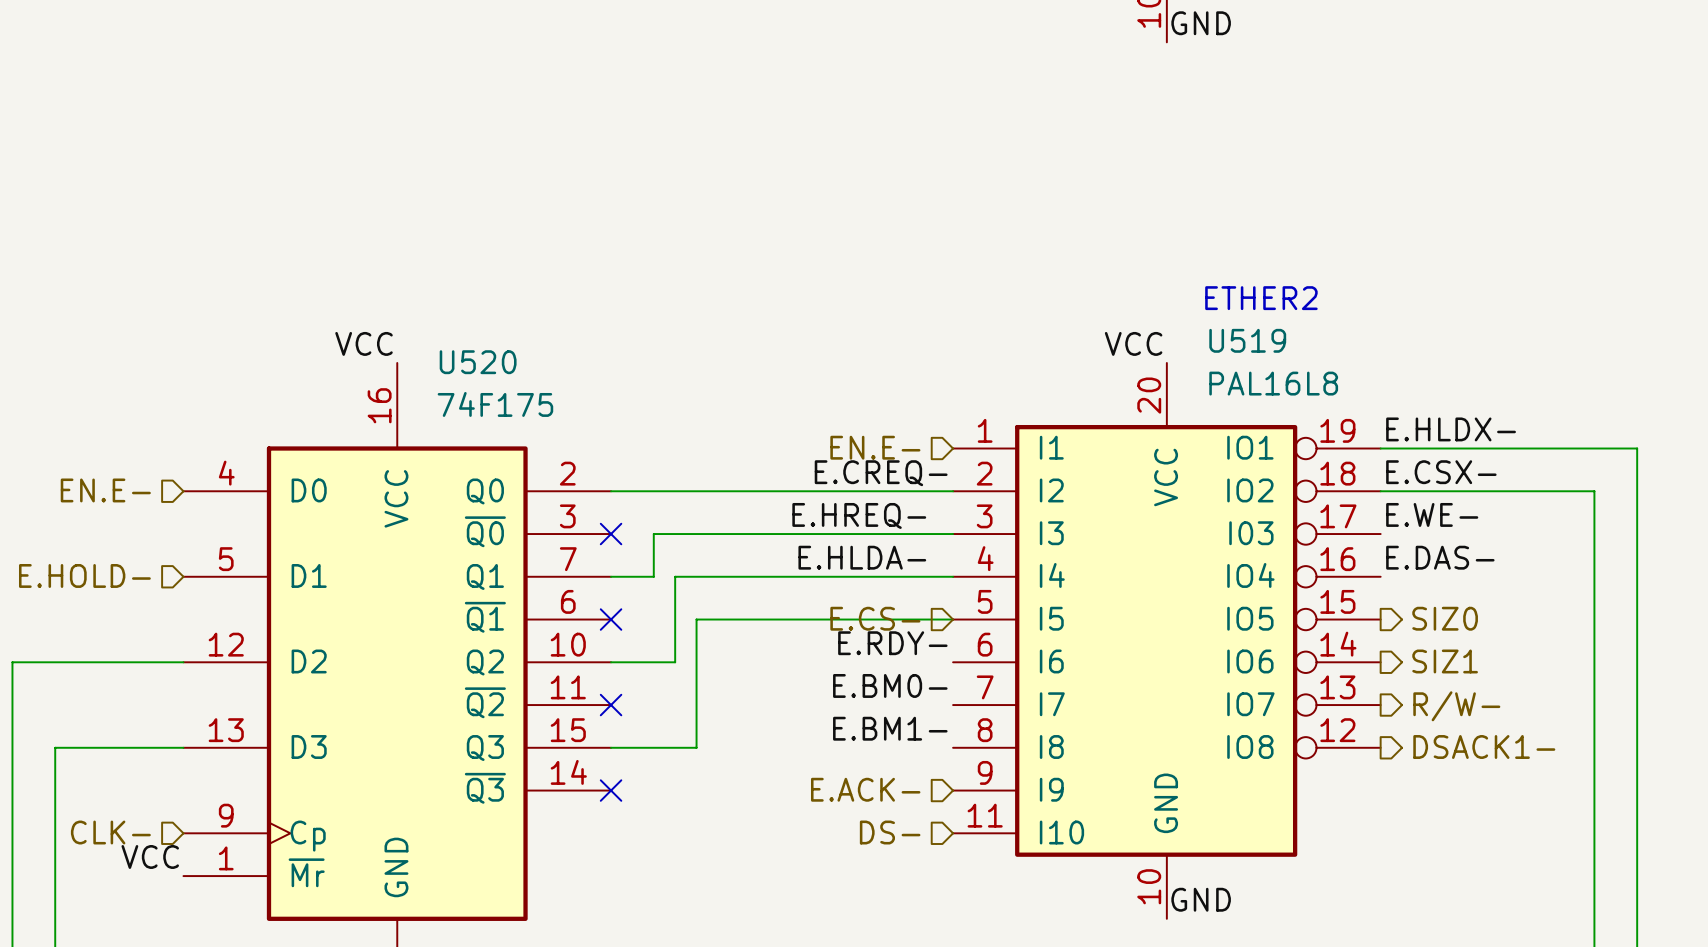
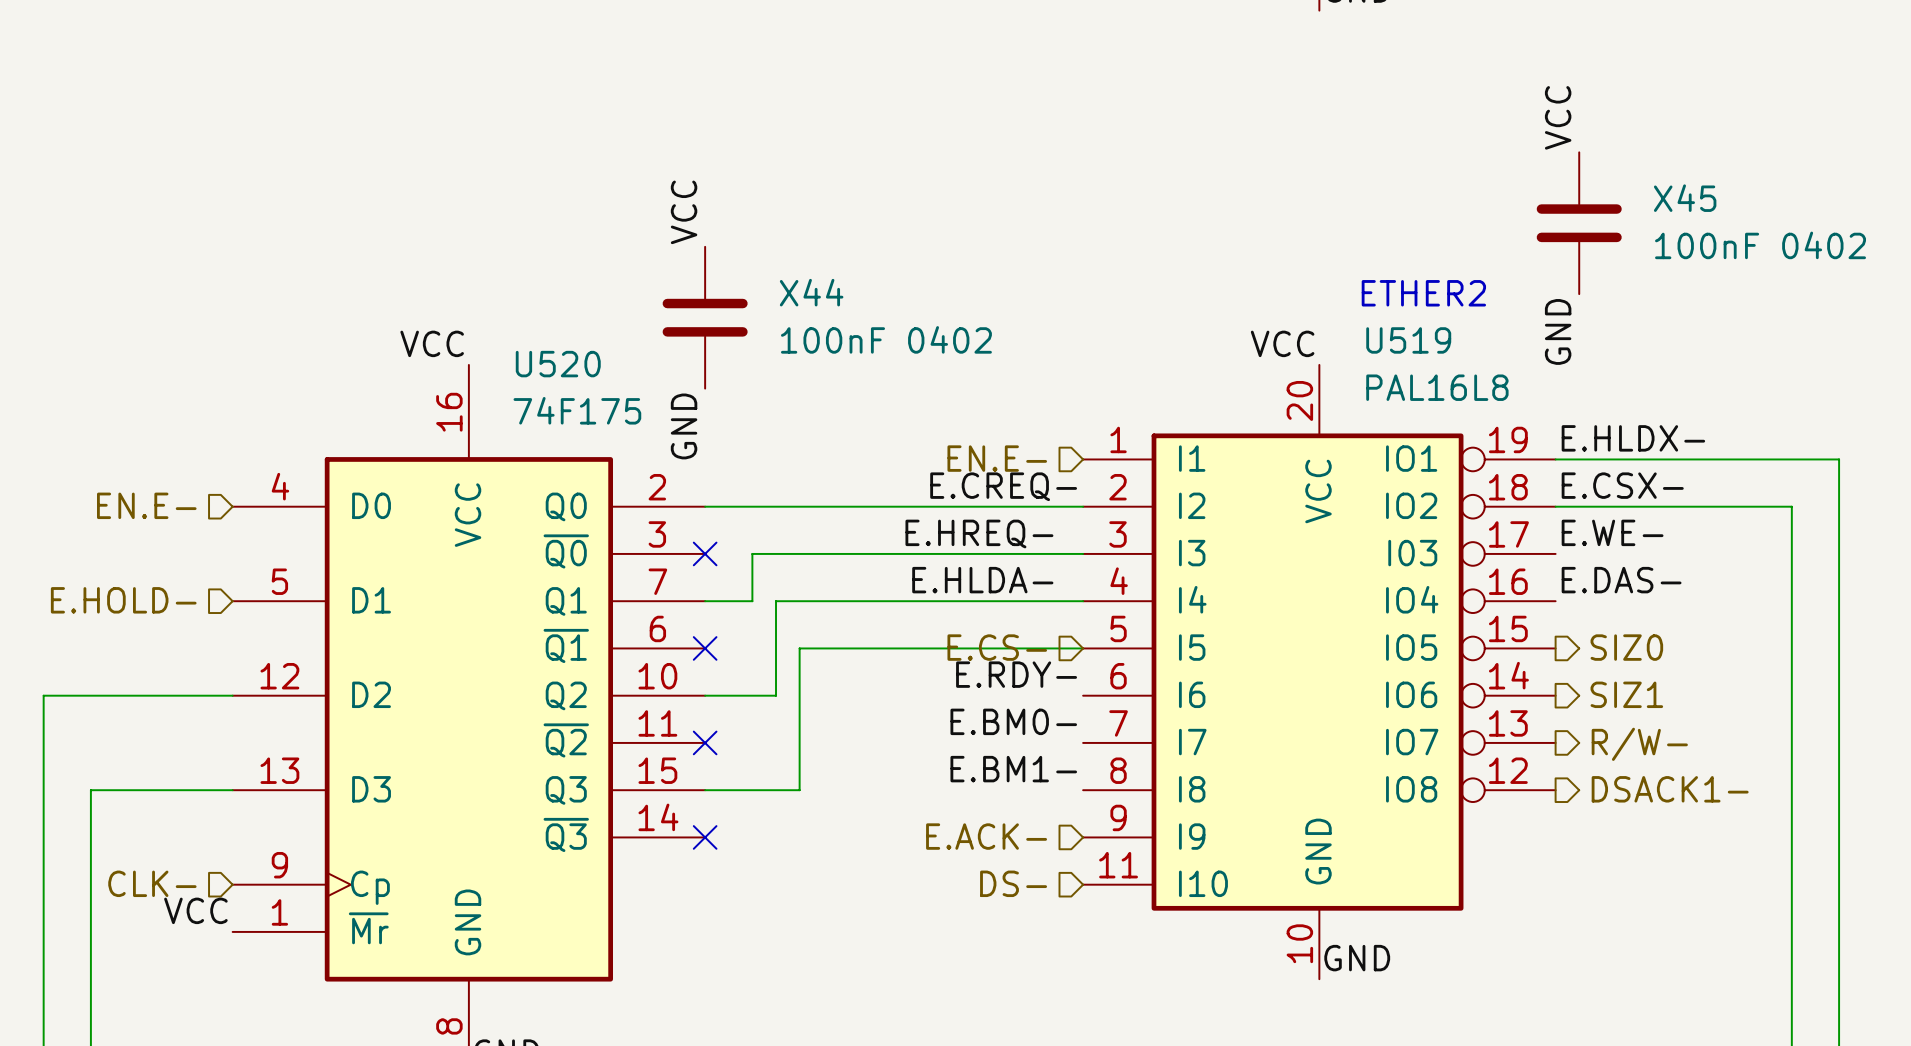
label: none -> VCC (1558, 117)
label: none -> VCC (684, 212)
X45: none -> 100nF 0402 (1579, 223)
X44: none -> 100nF 0402 (705, 317)
label: none -> GND (1558, 331)
label: none -> GND (684, 426)

